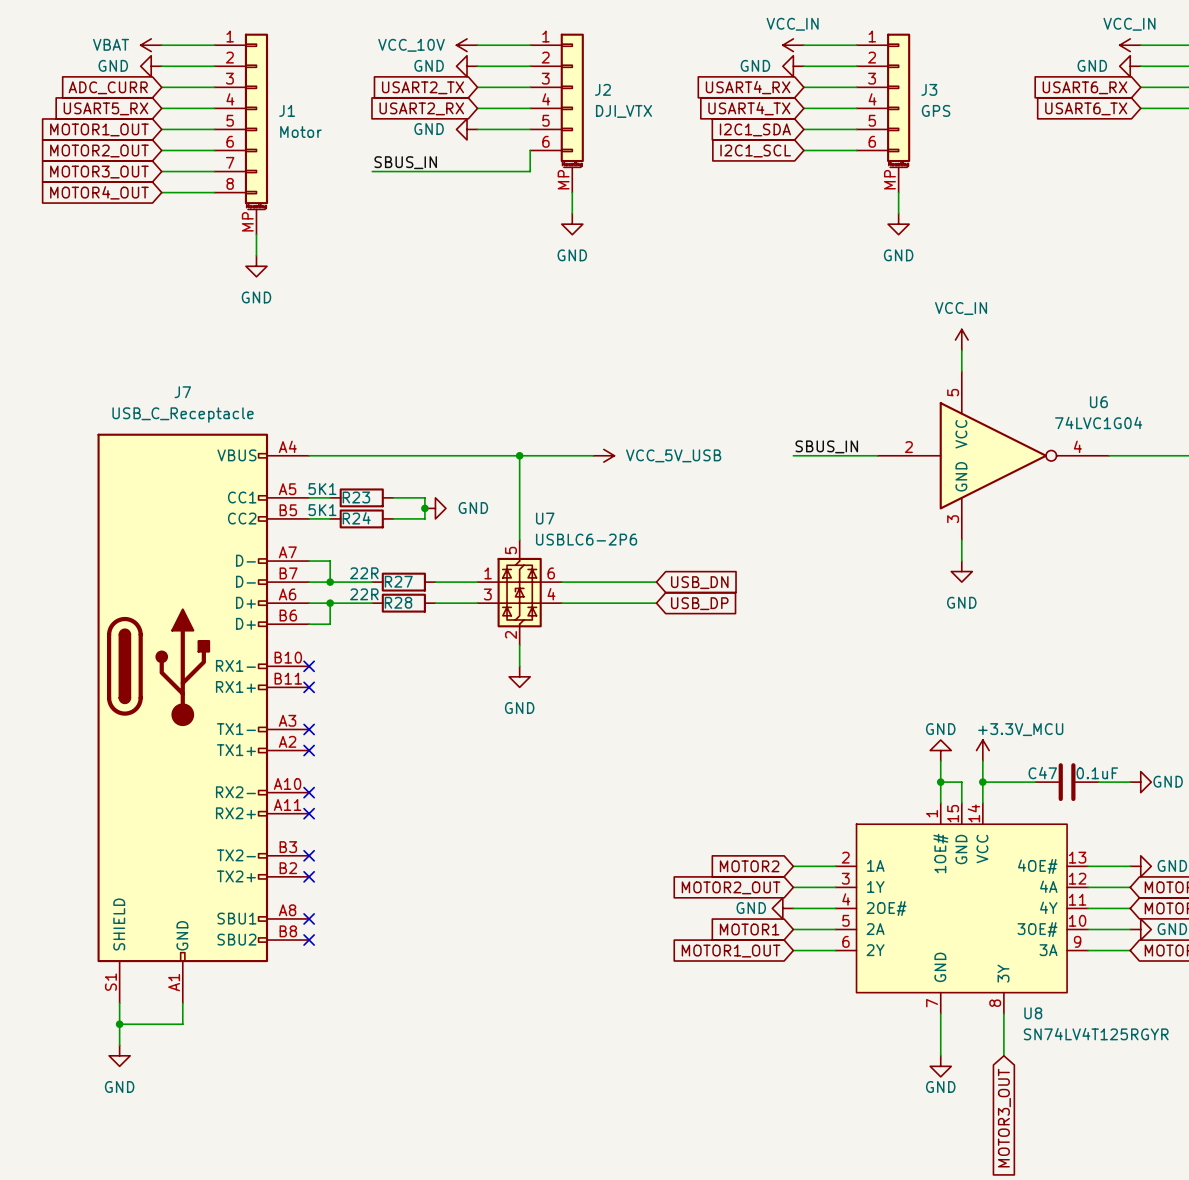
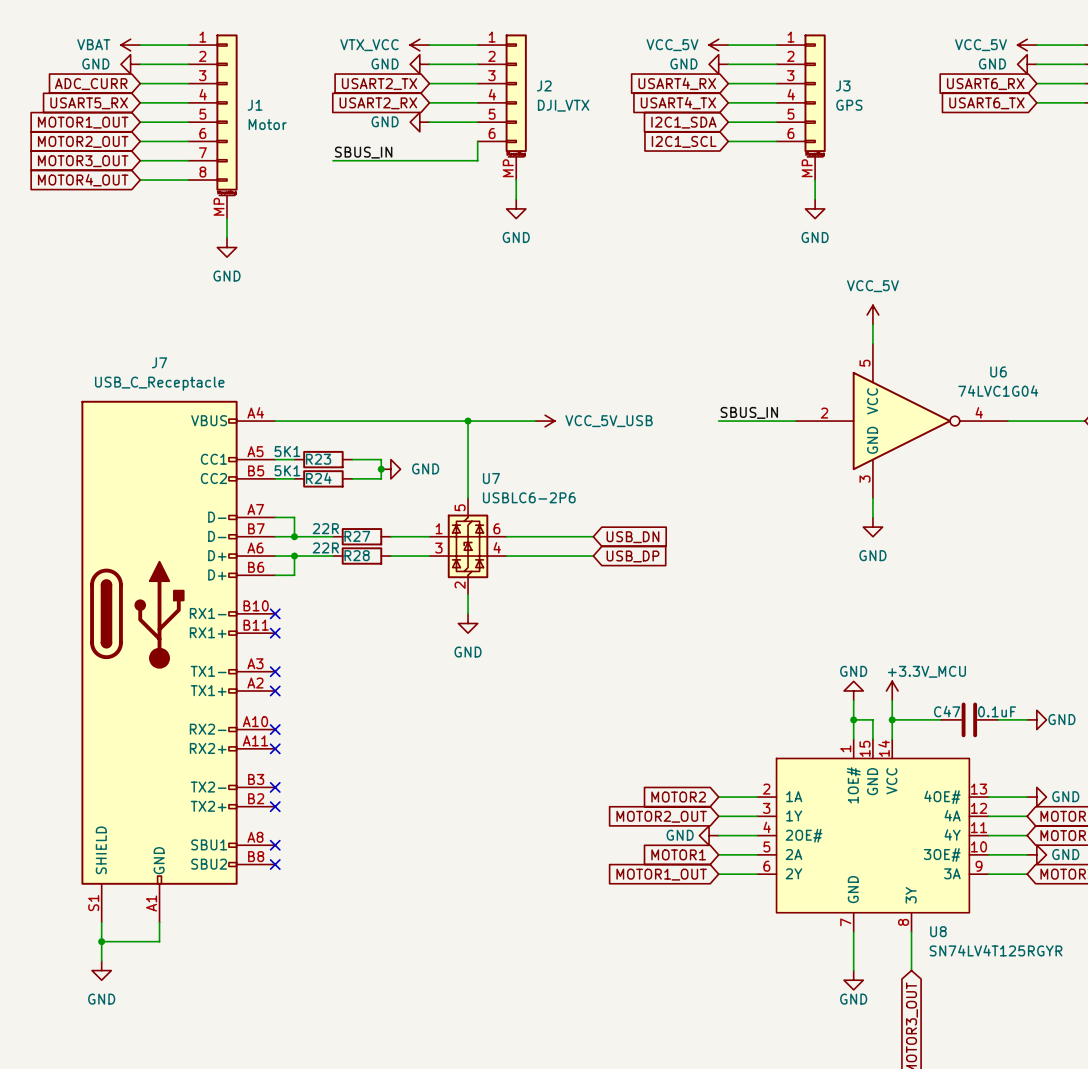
power symbol: VCC_10V (467, 45) -> VTX_VCC (419, 45)
power symbol: VCC_IN (793, 45) -> VCC_5V (718, 45)
power symbol: VCC_IN (1130, 45) -> VCC_5V (1027, 45)
power symbol: VCC_IN (961, 339) -> VCC_5V (872, 314)

